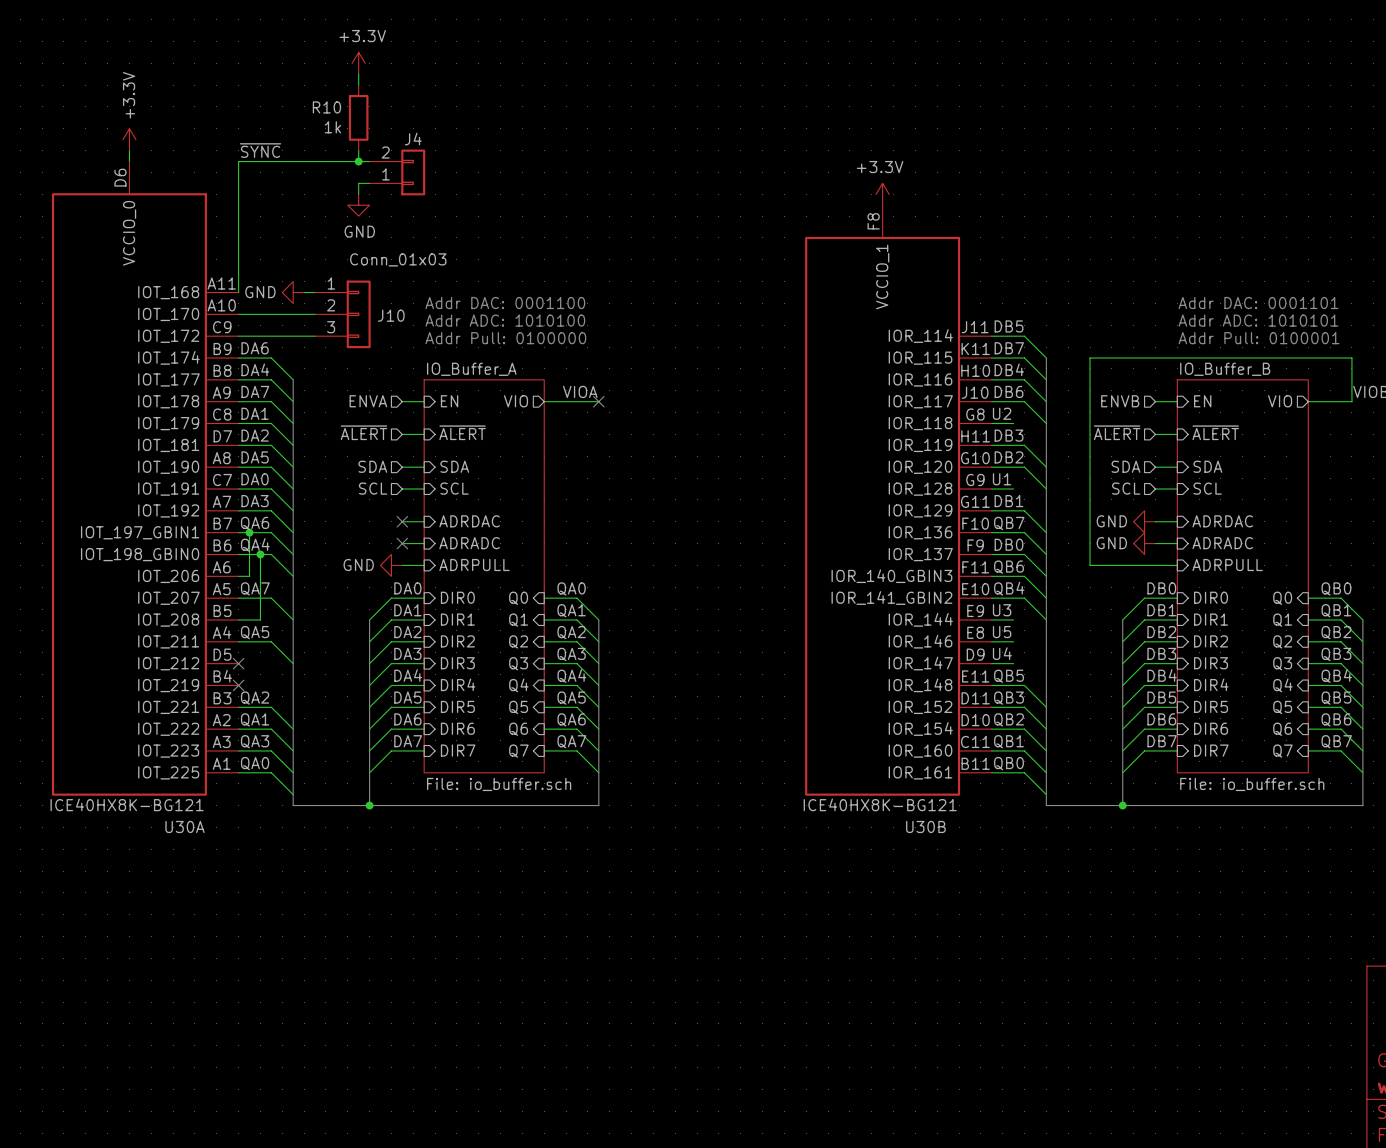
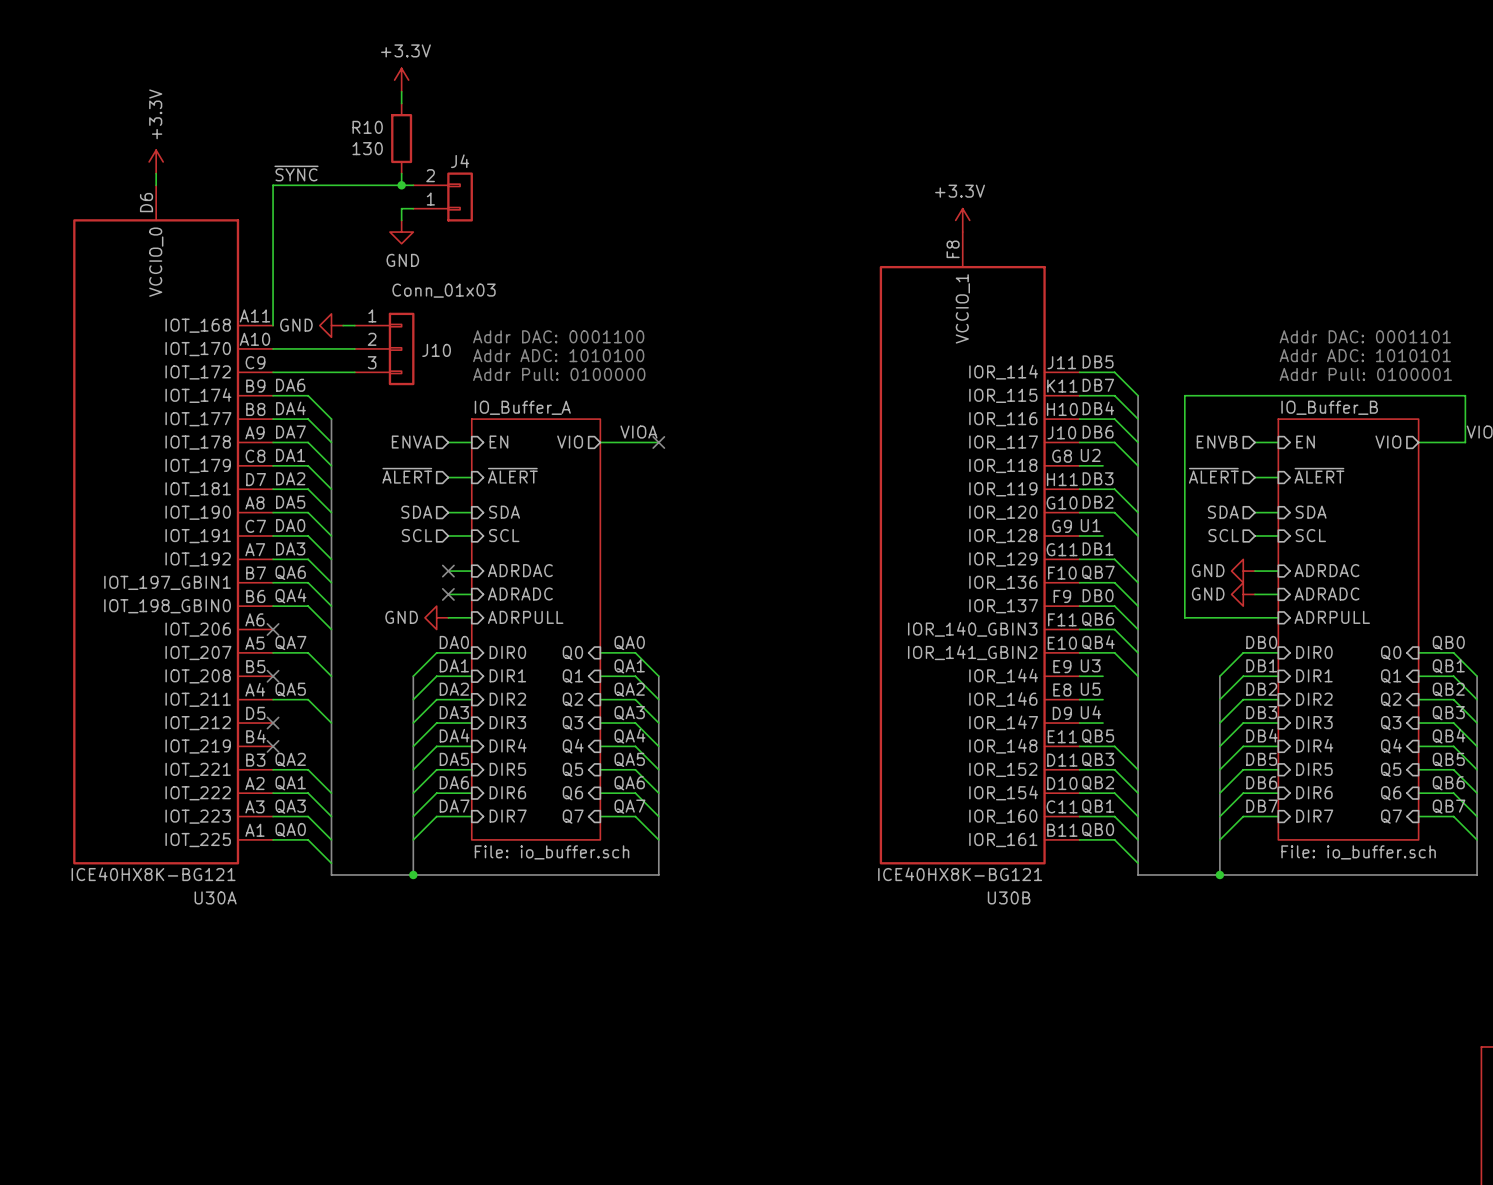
R10 value: 1k (332, 127) -> 130 (367, 148)
wire: (249, 532) (249, 576) (238, 576) -> none
junction: (249, 532) -> none
wire: (260, 554) (260, 619) (238, 619) -> none
junction: (260, 554) -> none
no-connect mark: none -> (273, 629)
no-connect mark: none -> (273, 676)

